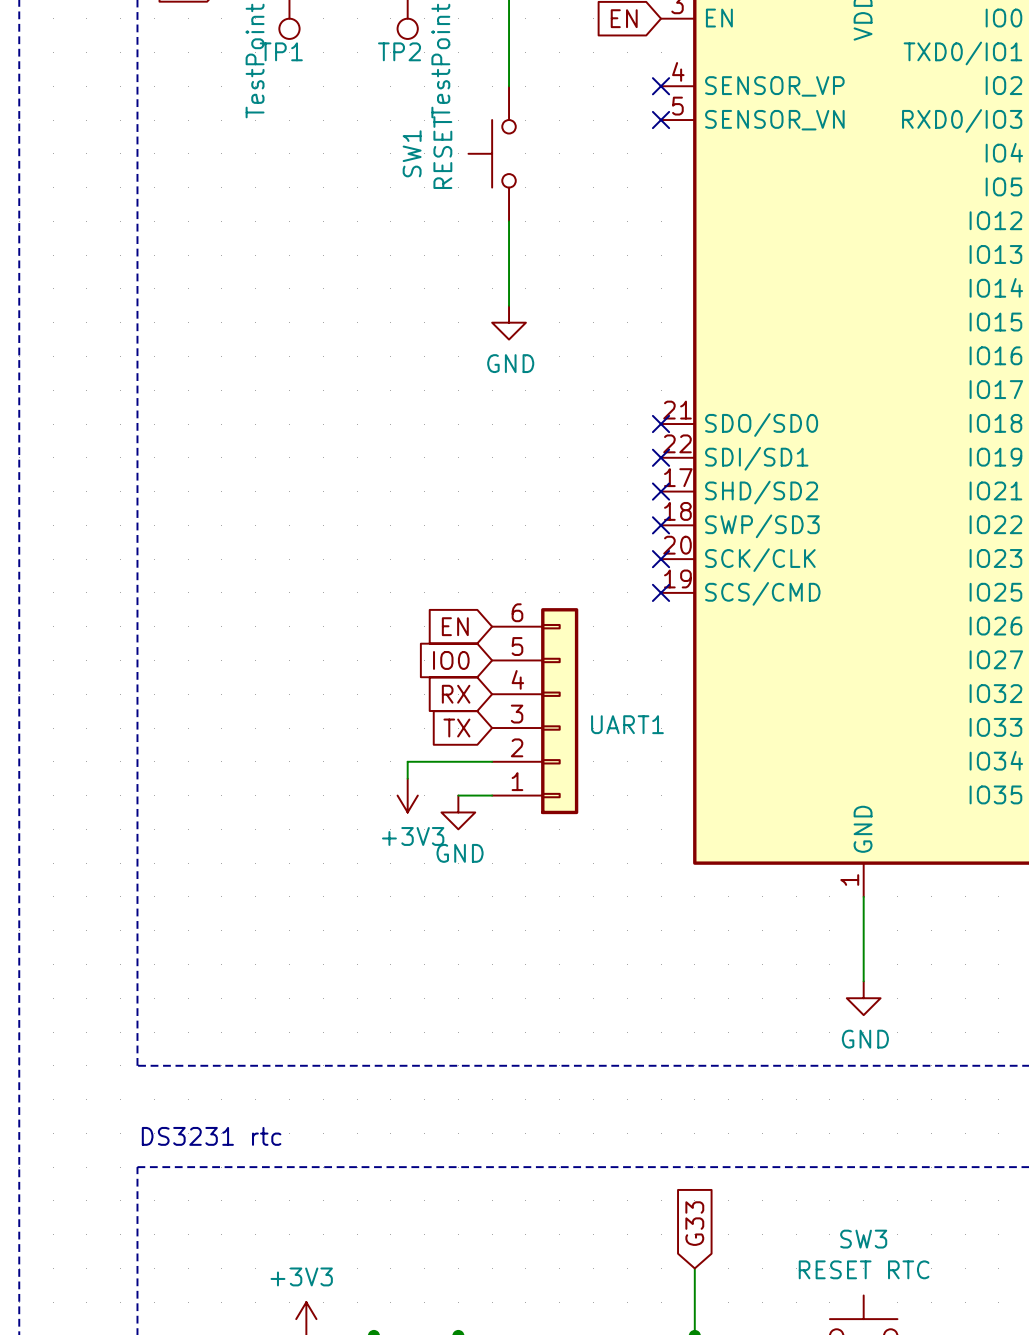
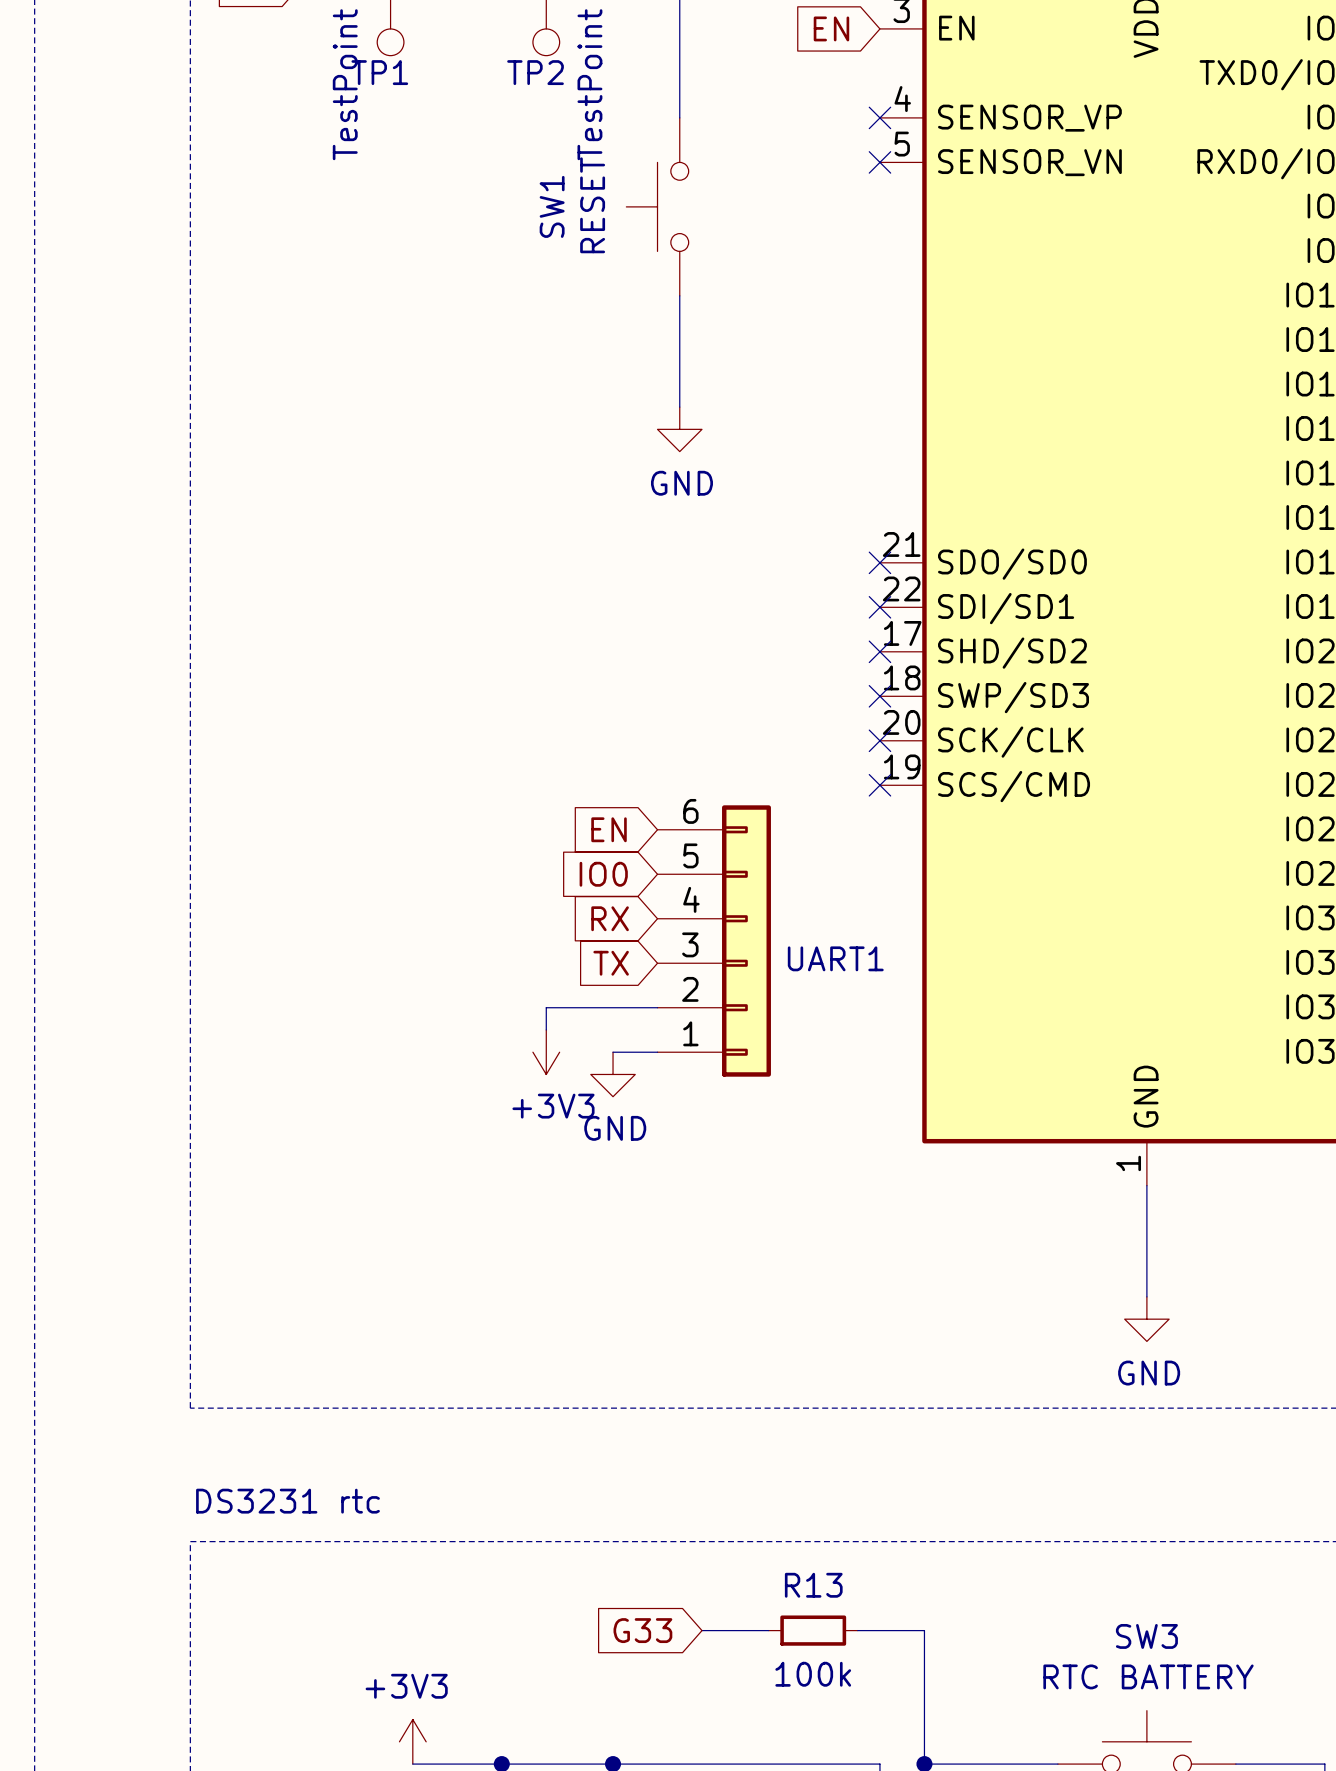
global label rotation: 0° (694, 1223) -> 90° counterclockwise (642, 1630)
global label position: G33 (694, 1223) -> G33 (642, 1630)
wire: none -> (702, 1630) (768, 1630)
R13: none -> 100k (813, 1630)
wire: none -> (857, 1630) (924, 1630) (924, 1675)
SW3 value: RESET RTC (864, 1269) -> RTC BATTERY (1148, 1676)

